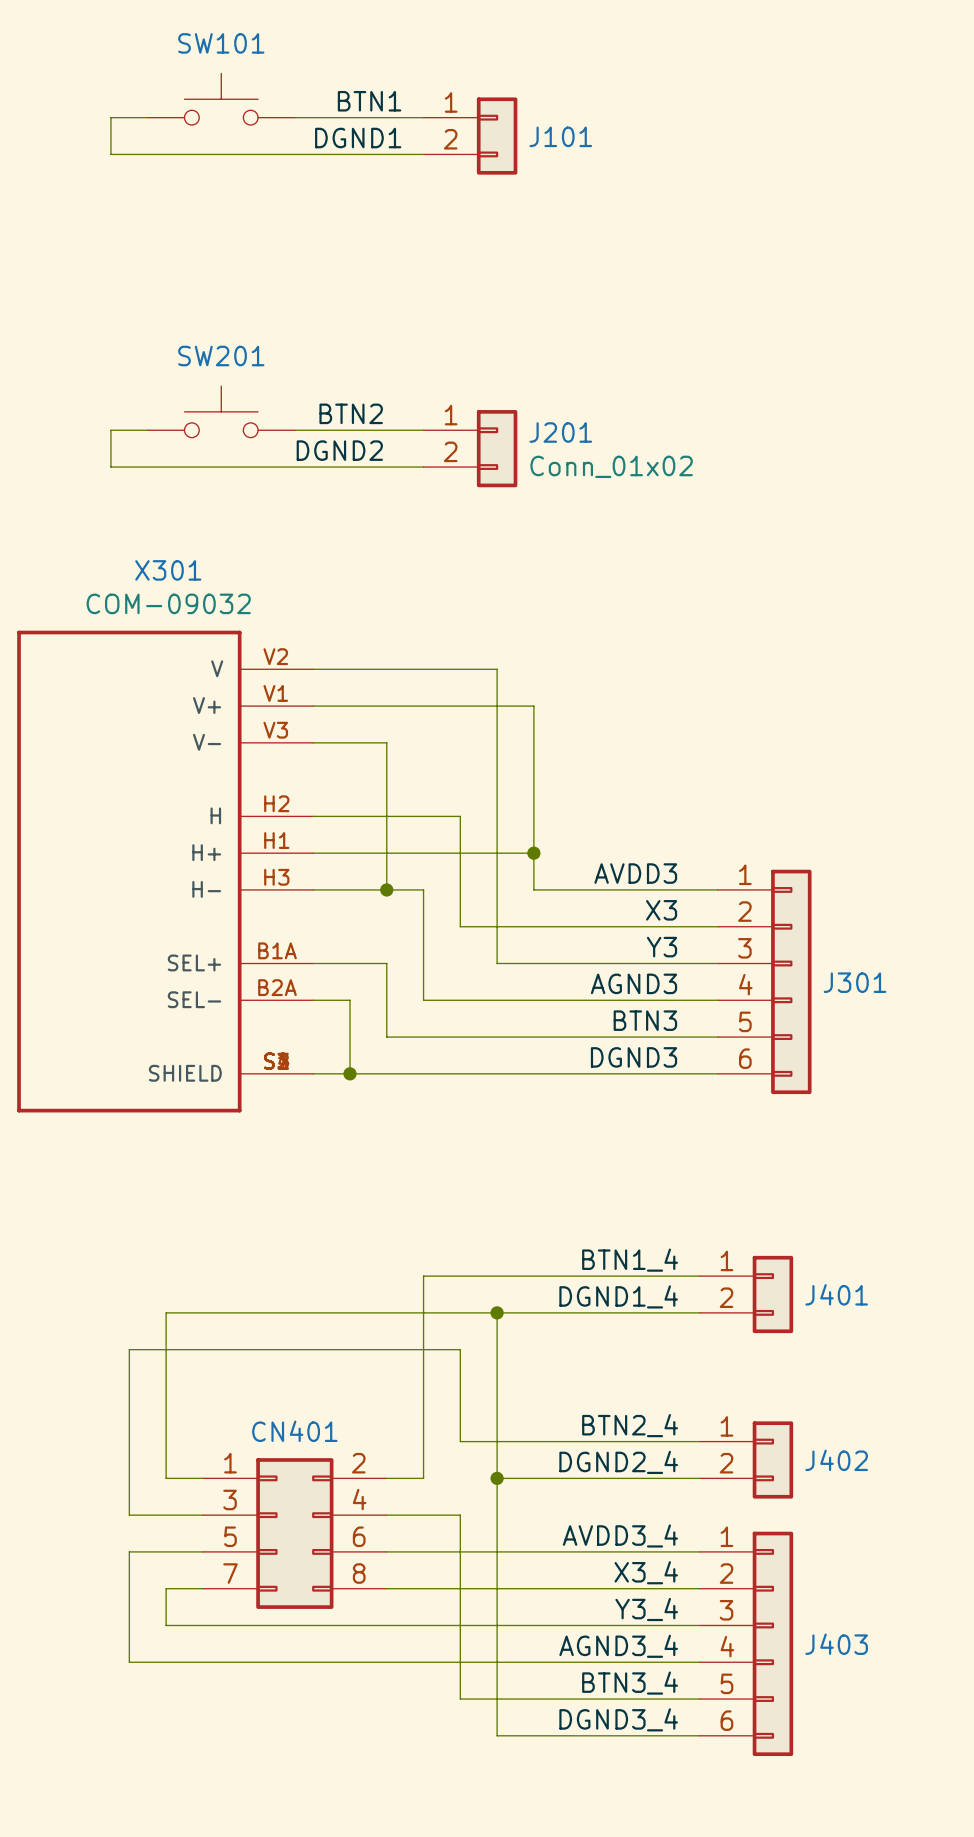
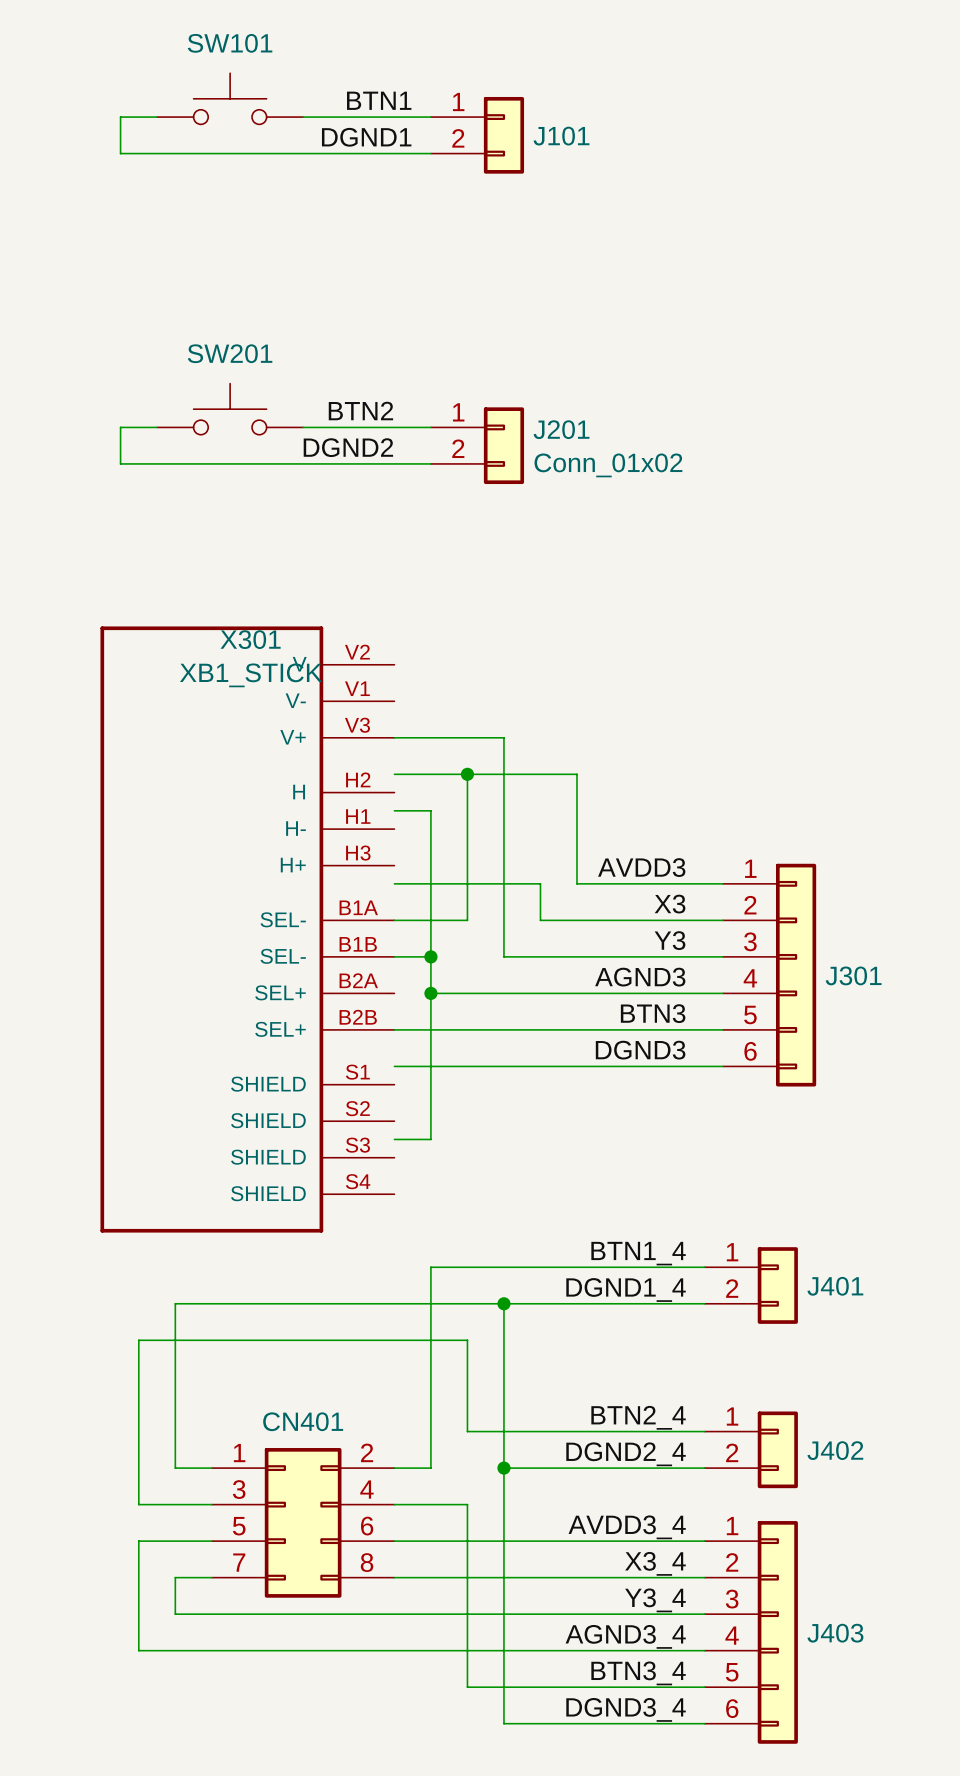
X301 value: COM-09032 (168, 603) -> XB1_STICK (251, 675)
X301 symbol: [17, 630, 314, 1113] -> [100, 626, 395, 1233]
wire: (313, 669) (497, 669) (497, 742) -> (394, 737) (503, 737)
wire: (313, 706) (533, 706) (533, 889) (570, 889) -> (394, 774) (576, 774) (576, 883)
wire: (313, 742) (386, 742) (386, 889) (313, 889) -> none
junction: none -> (467, 774)
wire: (313, 816) (386, 816) -> (394, 920) (467, 920)
wire: (423, 816) (460, 816) -> (467, 774) (467, 810)
wire: (313, 853) (533, 853) -> none
junction: (533, 853) -> none
junction: (386, 889) -> none
wire: (460, 926) (533, 926) -> (430, 810) (430, 883) (540, 883) (540, 920)
wire: (313, 963) (386, 963) (386, 1037) -> none
wire: none -> (394, 956) (430, 956)
junction: none -> (430, 956)
wire: (313, 1000) (350, 1000) (350, 1073) -> none
wire: none -> (430, 993) (430, 1139) (394, 1139)
junction: none -> (430, 993)
wire: (313, 1073) (386, 1073) -> none
junction: (350, 1073) -> none

